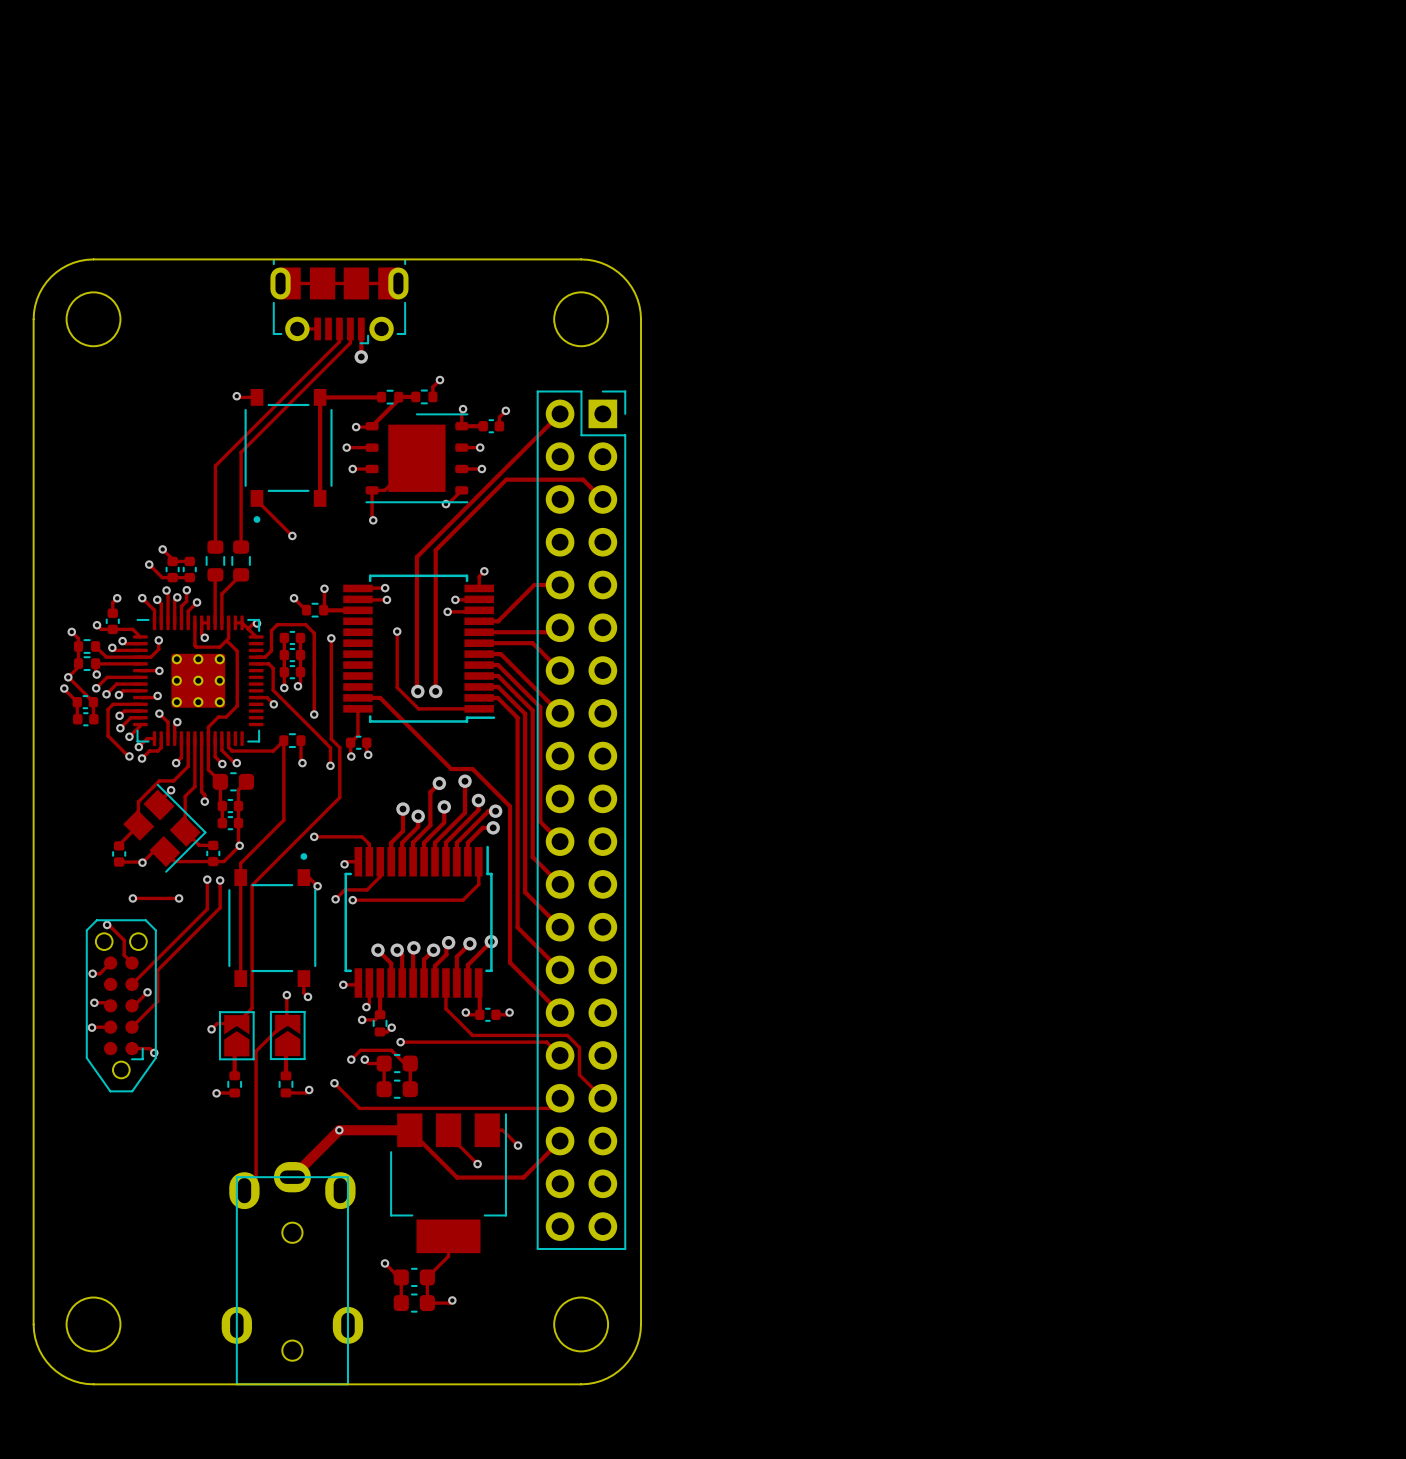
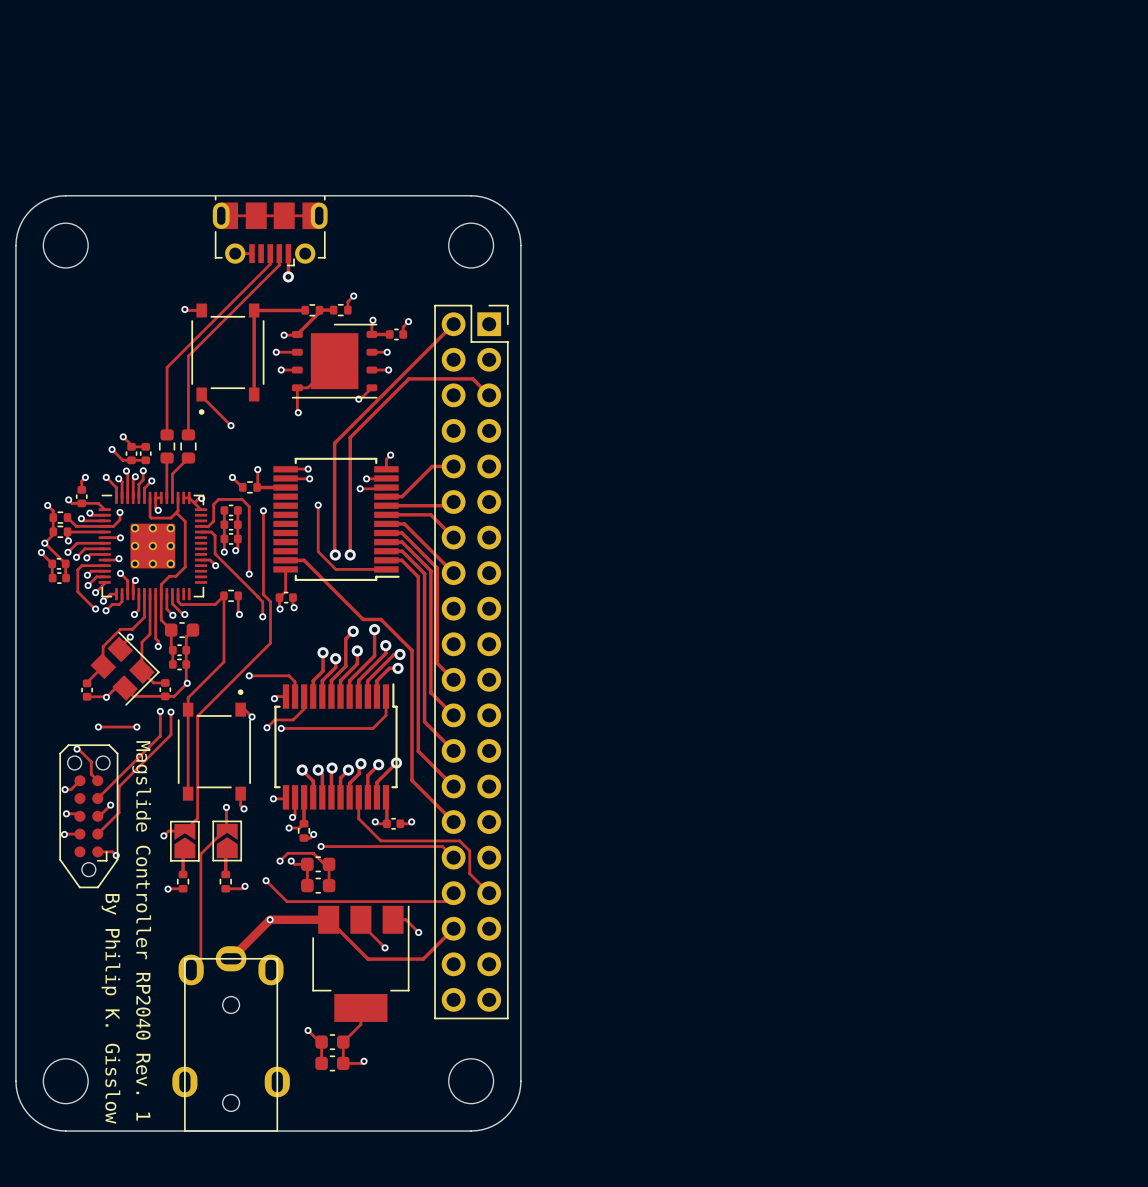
text: none -> Magslide Controller RP2040 Rev. 1 (141, 930)
text: none -> By Philip K. Gisslow (110, 1008)

